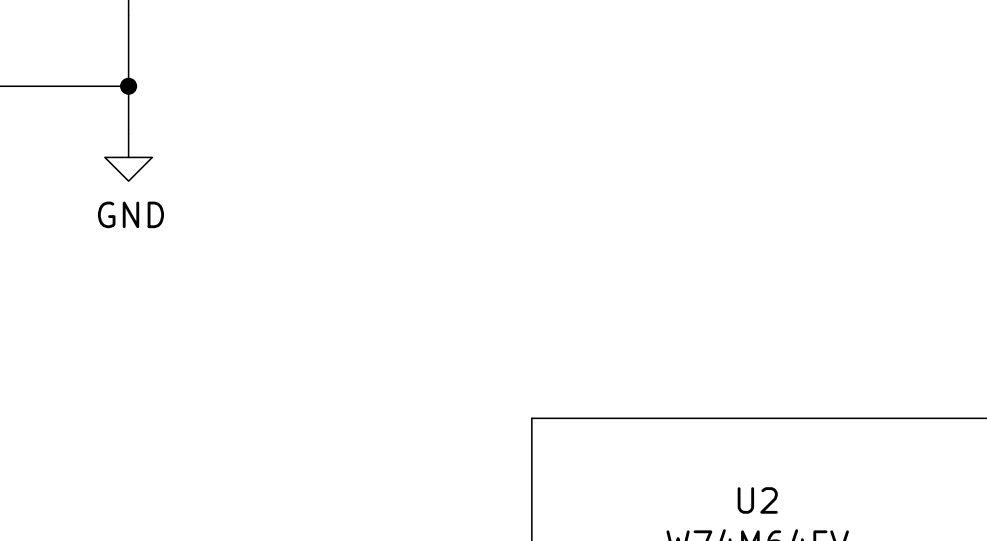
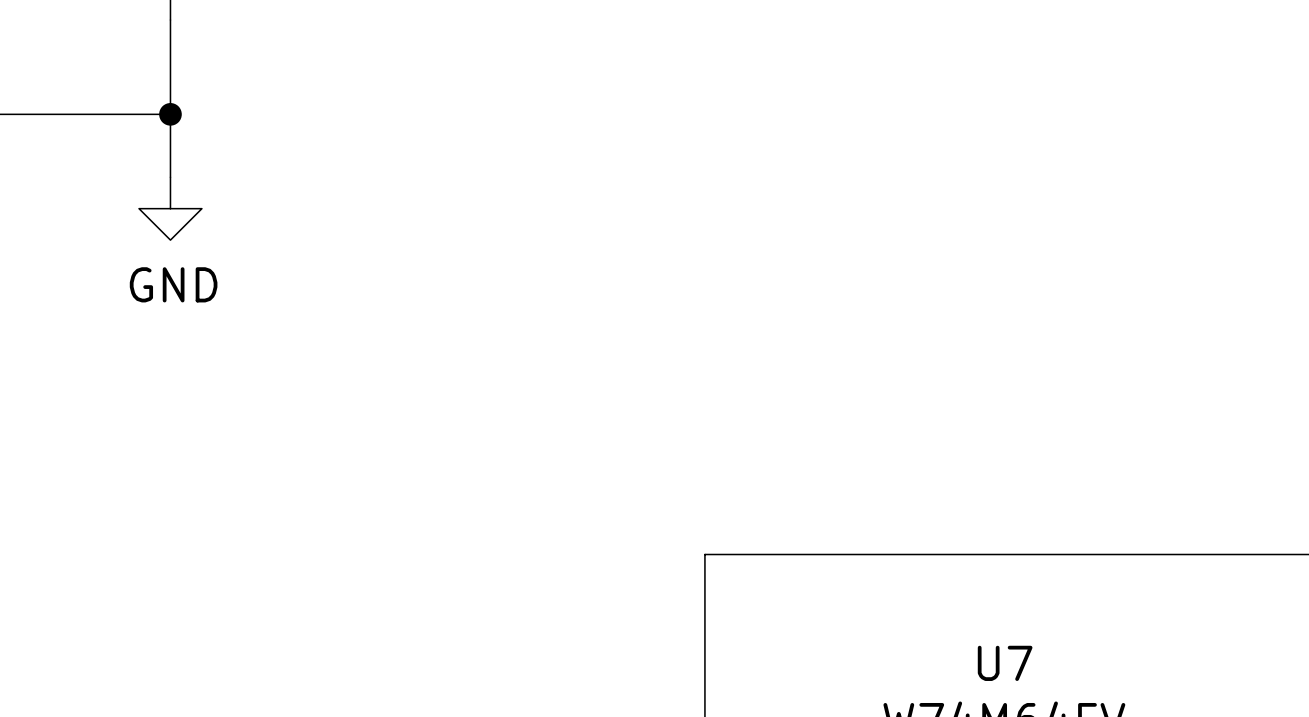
U2 name: U2 (757, 500) -> U7 (1005, 663)

